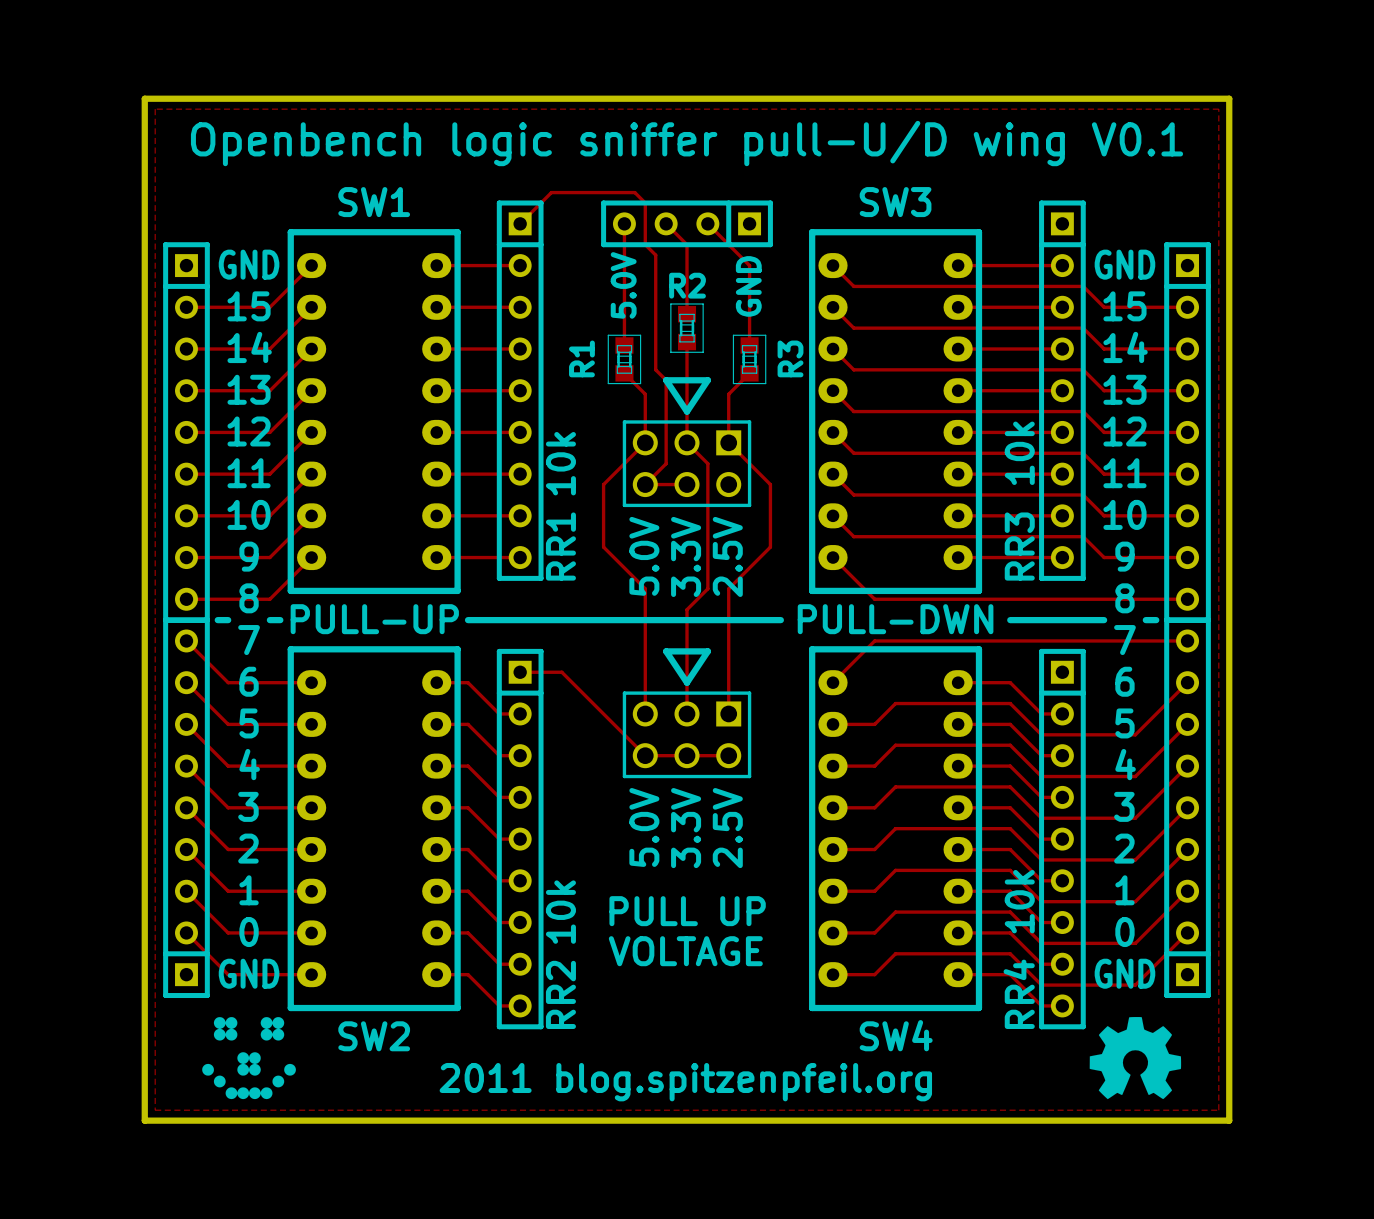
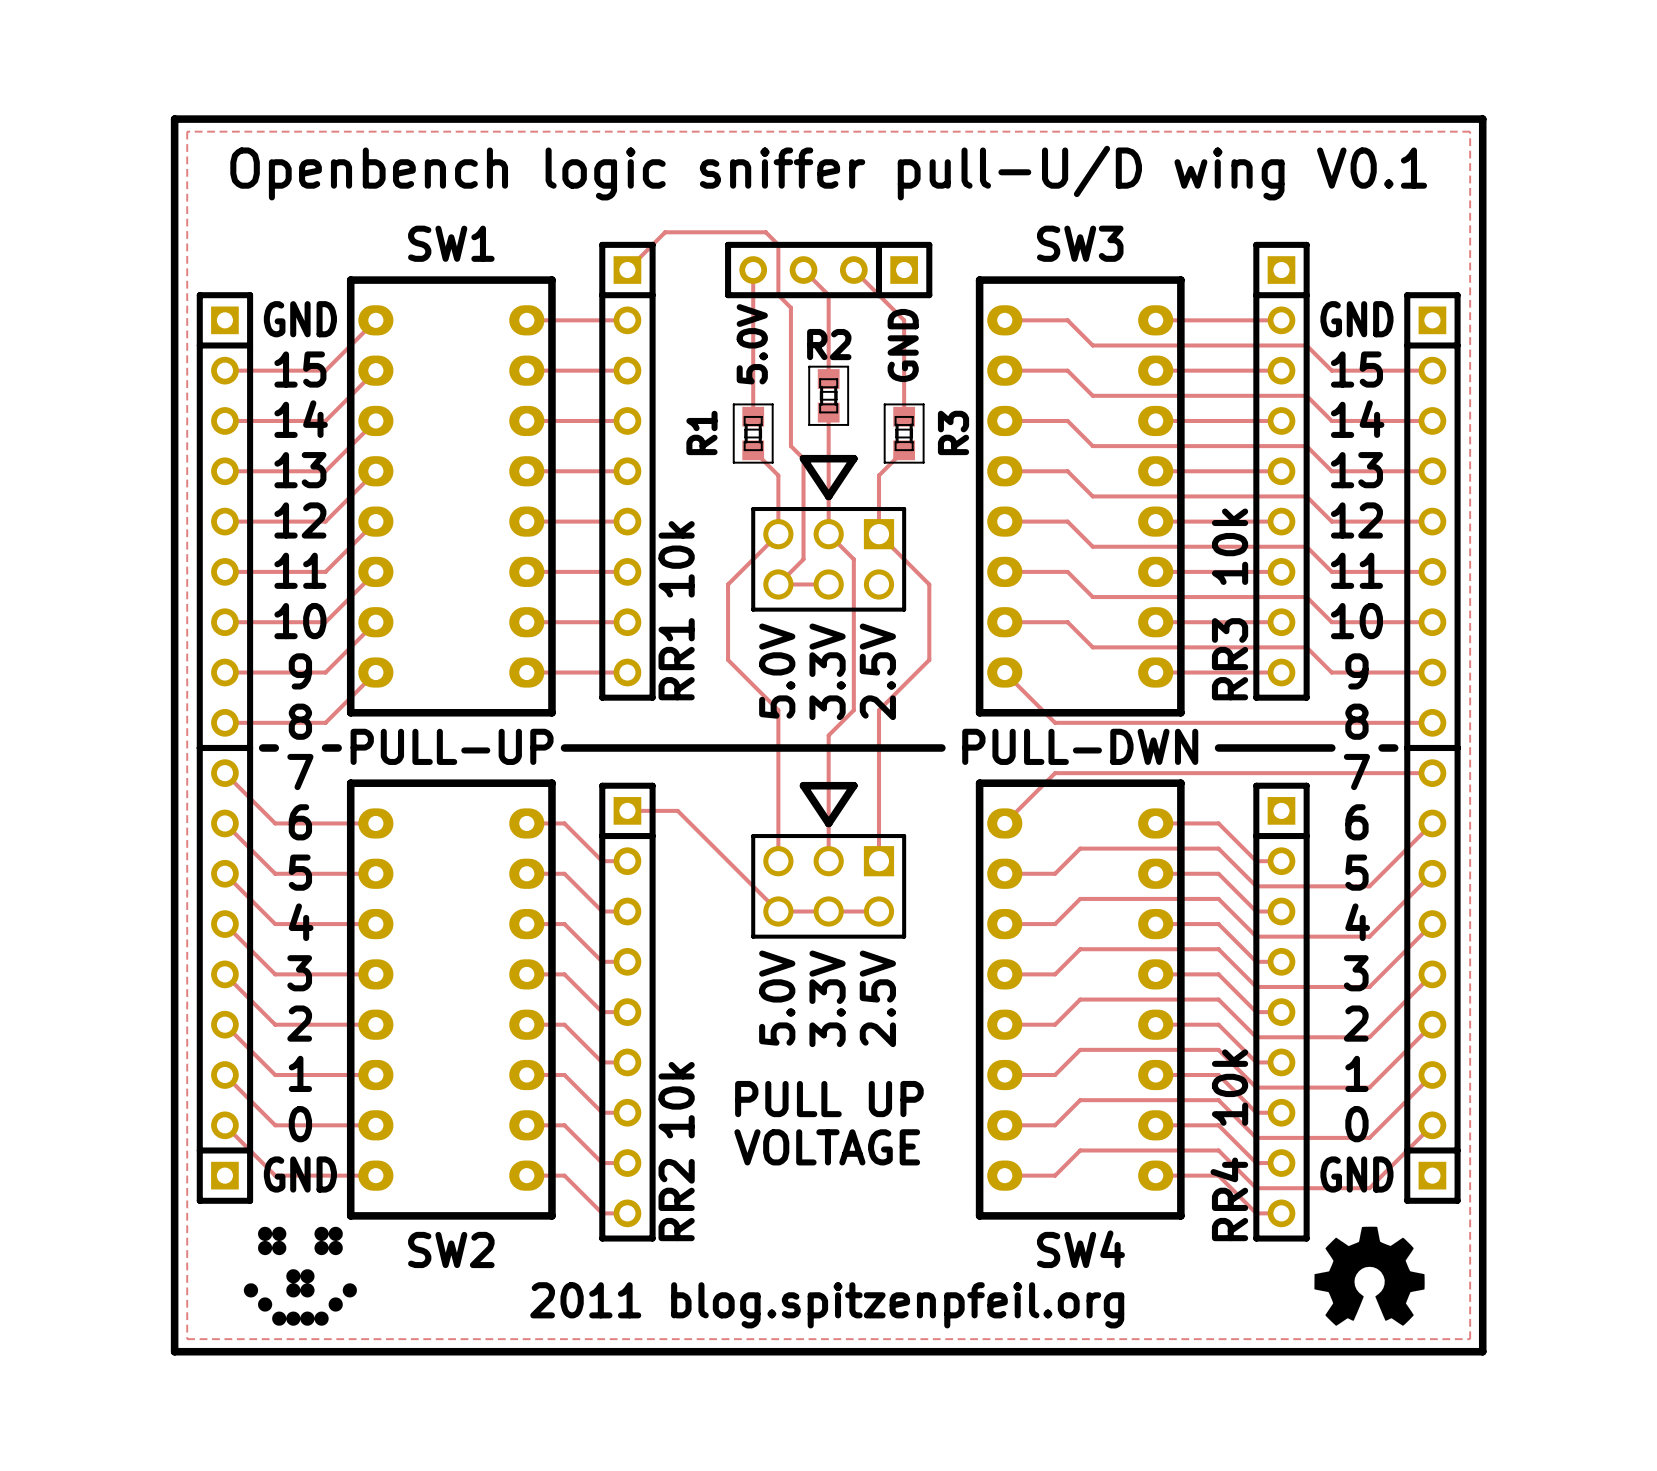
track: (832, 265) (853, 286) (905, 286) -> (1004, 320) (1067, 320) (1092, 345)
track: (832, 307) (853, 328) (905, 328) -> (1004, 370) (1067, 370) (1092, 395)
track: (832, 348) (853, 369) (905, 369) -> (1004, 420) (1067, 420) (1092, 446)
track: (832, 390) (853, 411) (905, 411) -> (1004, 471) (1067, 471) (1092, 496)
track: (832, 432) (853, 453) (905, 453) -> (1004, 521) (1067, 521) (1092, 546)
track: (832, 474) (853, 494) (905, 494) -> (1004, 571) (1067, 571) (1092, 597)
track: (832, 515) (853, 536) (905, 536) -> (1004, 622) (1067, 622) (1092, 647)

